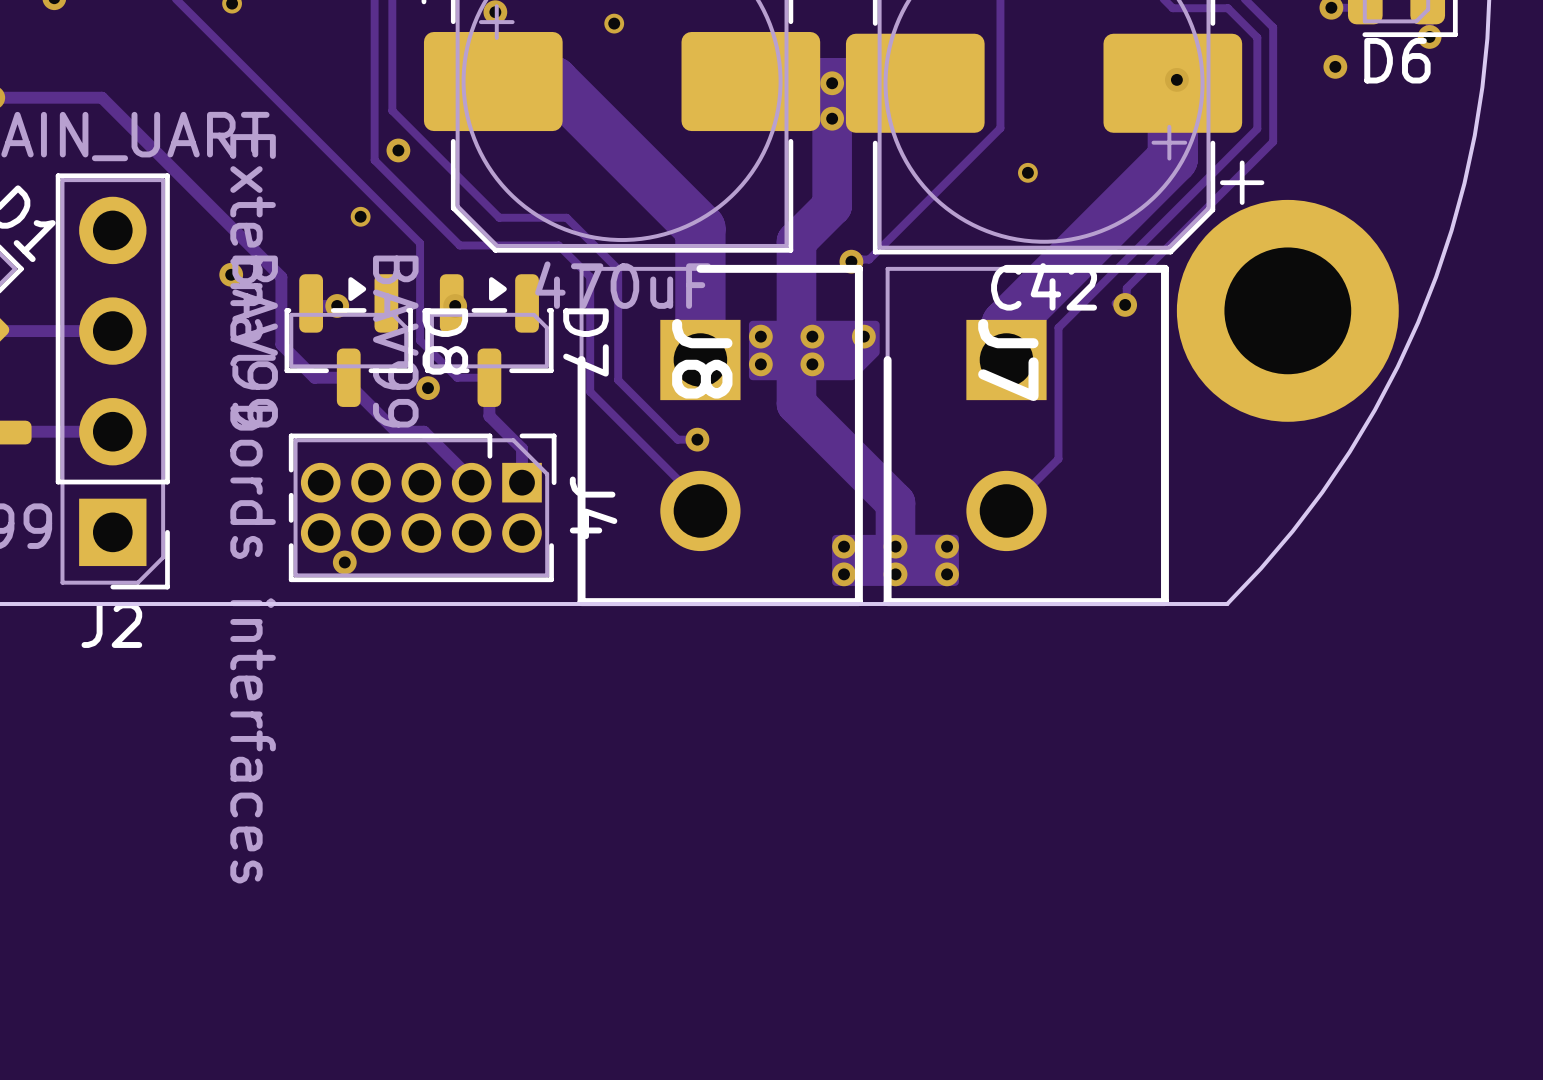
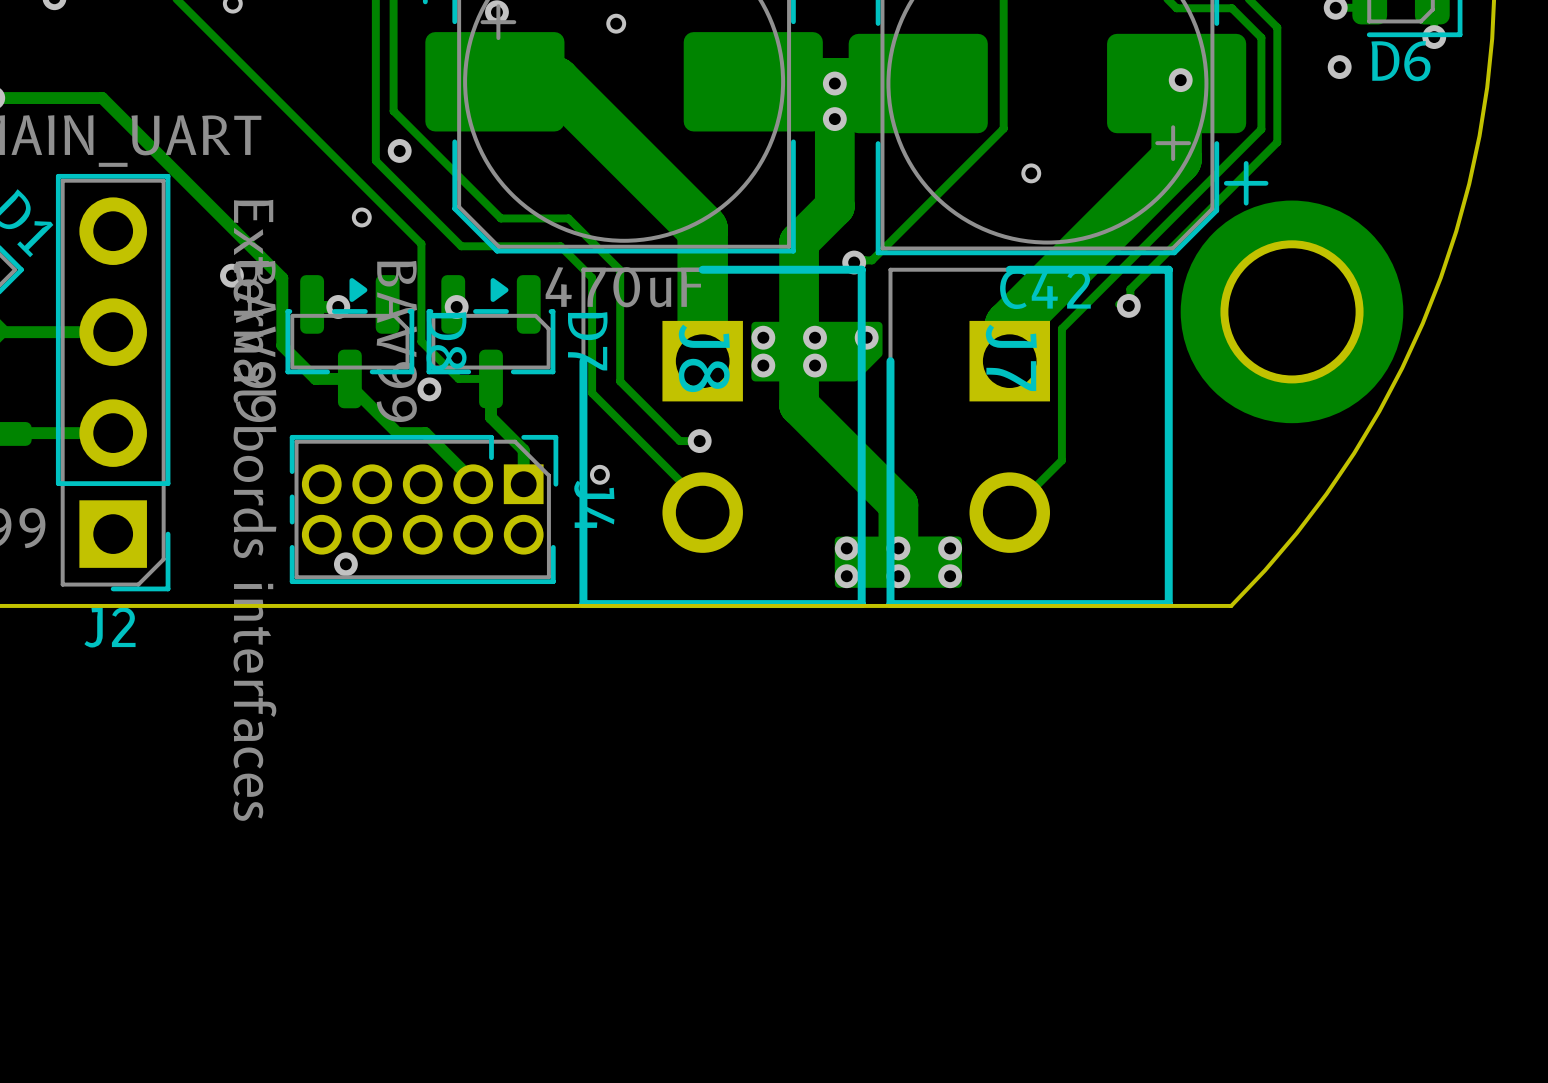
via: none -> (599, 474)

